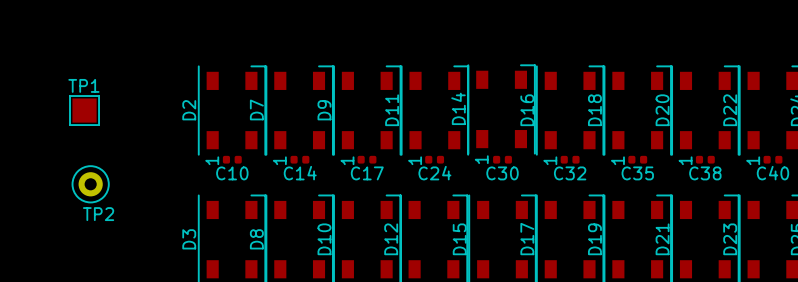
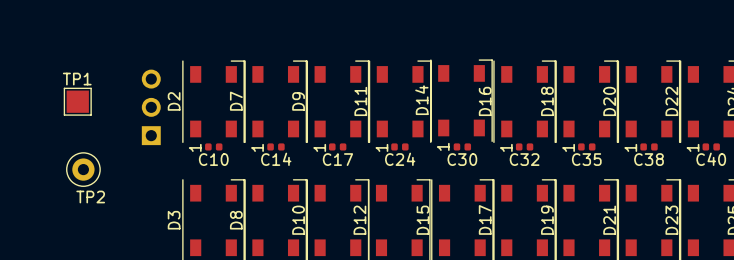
part: none -> (151, 107)

